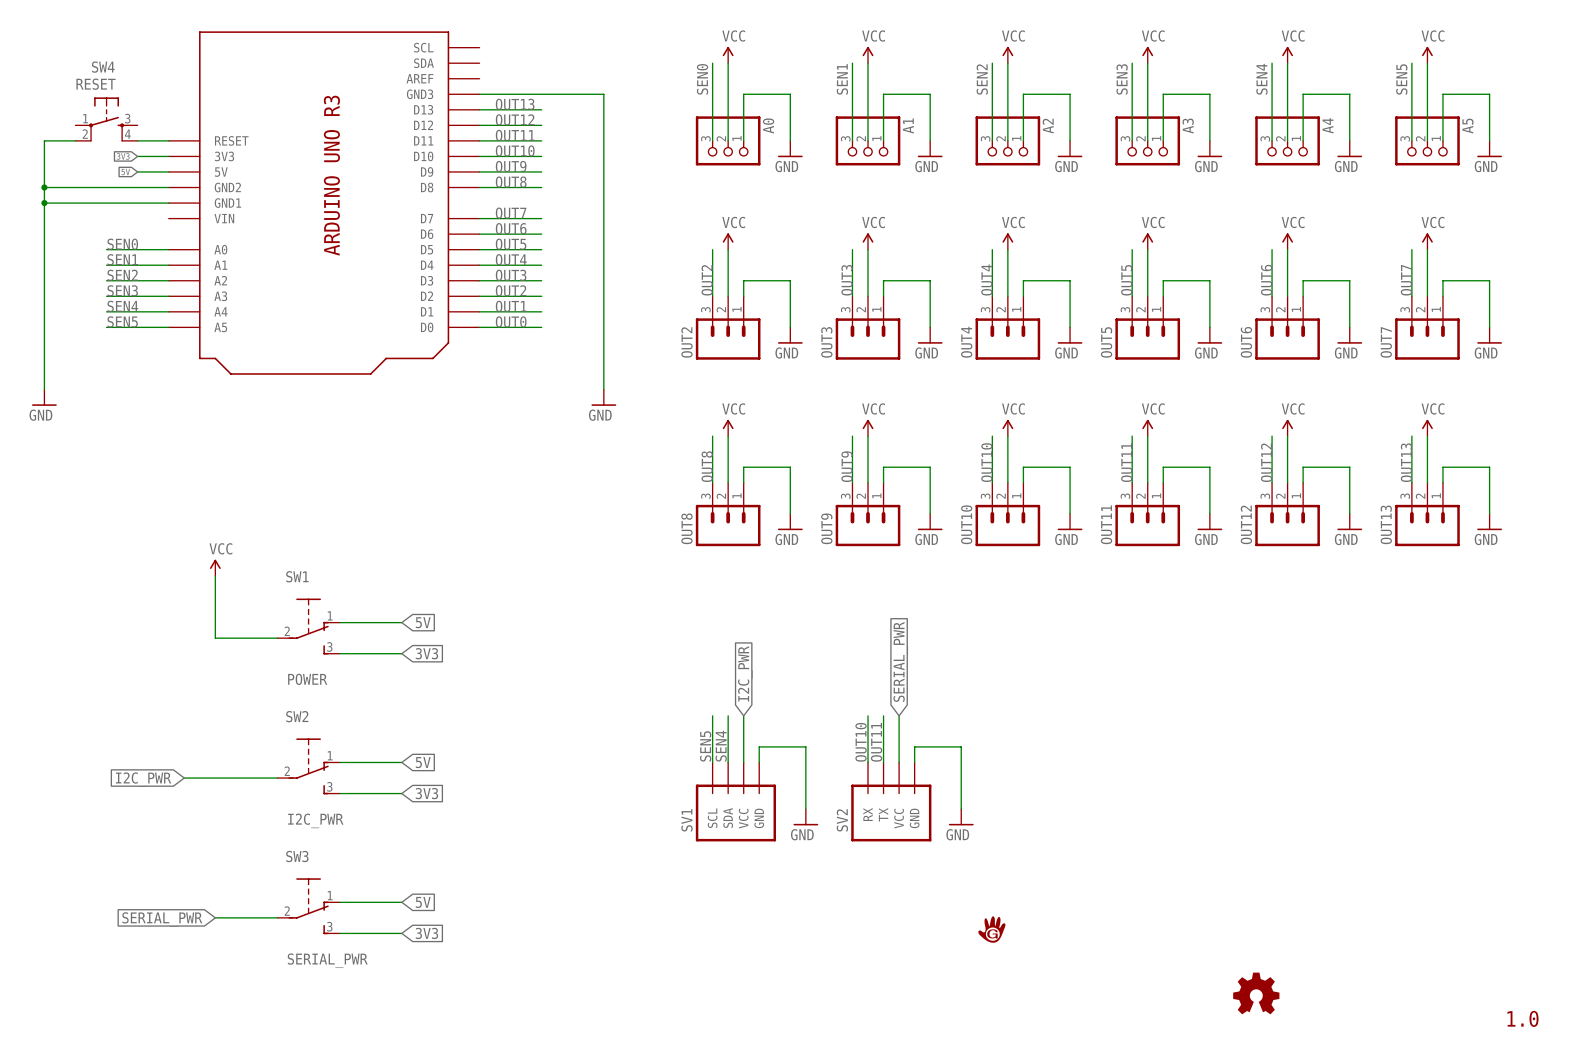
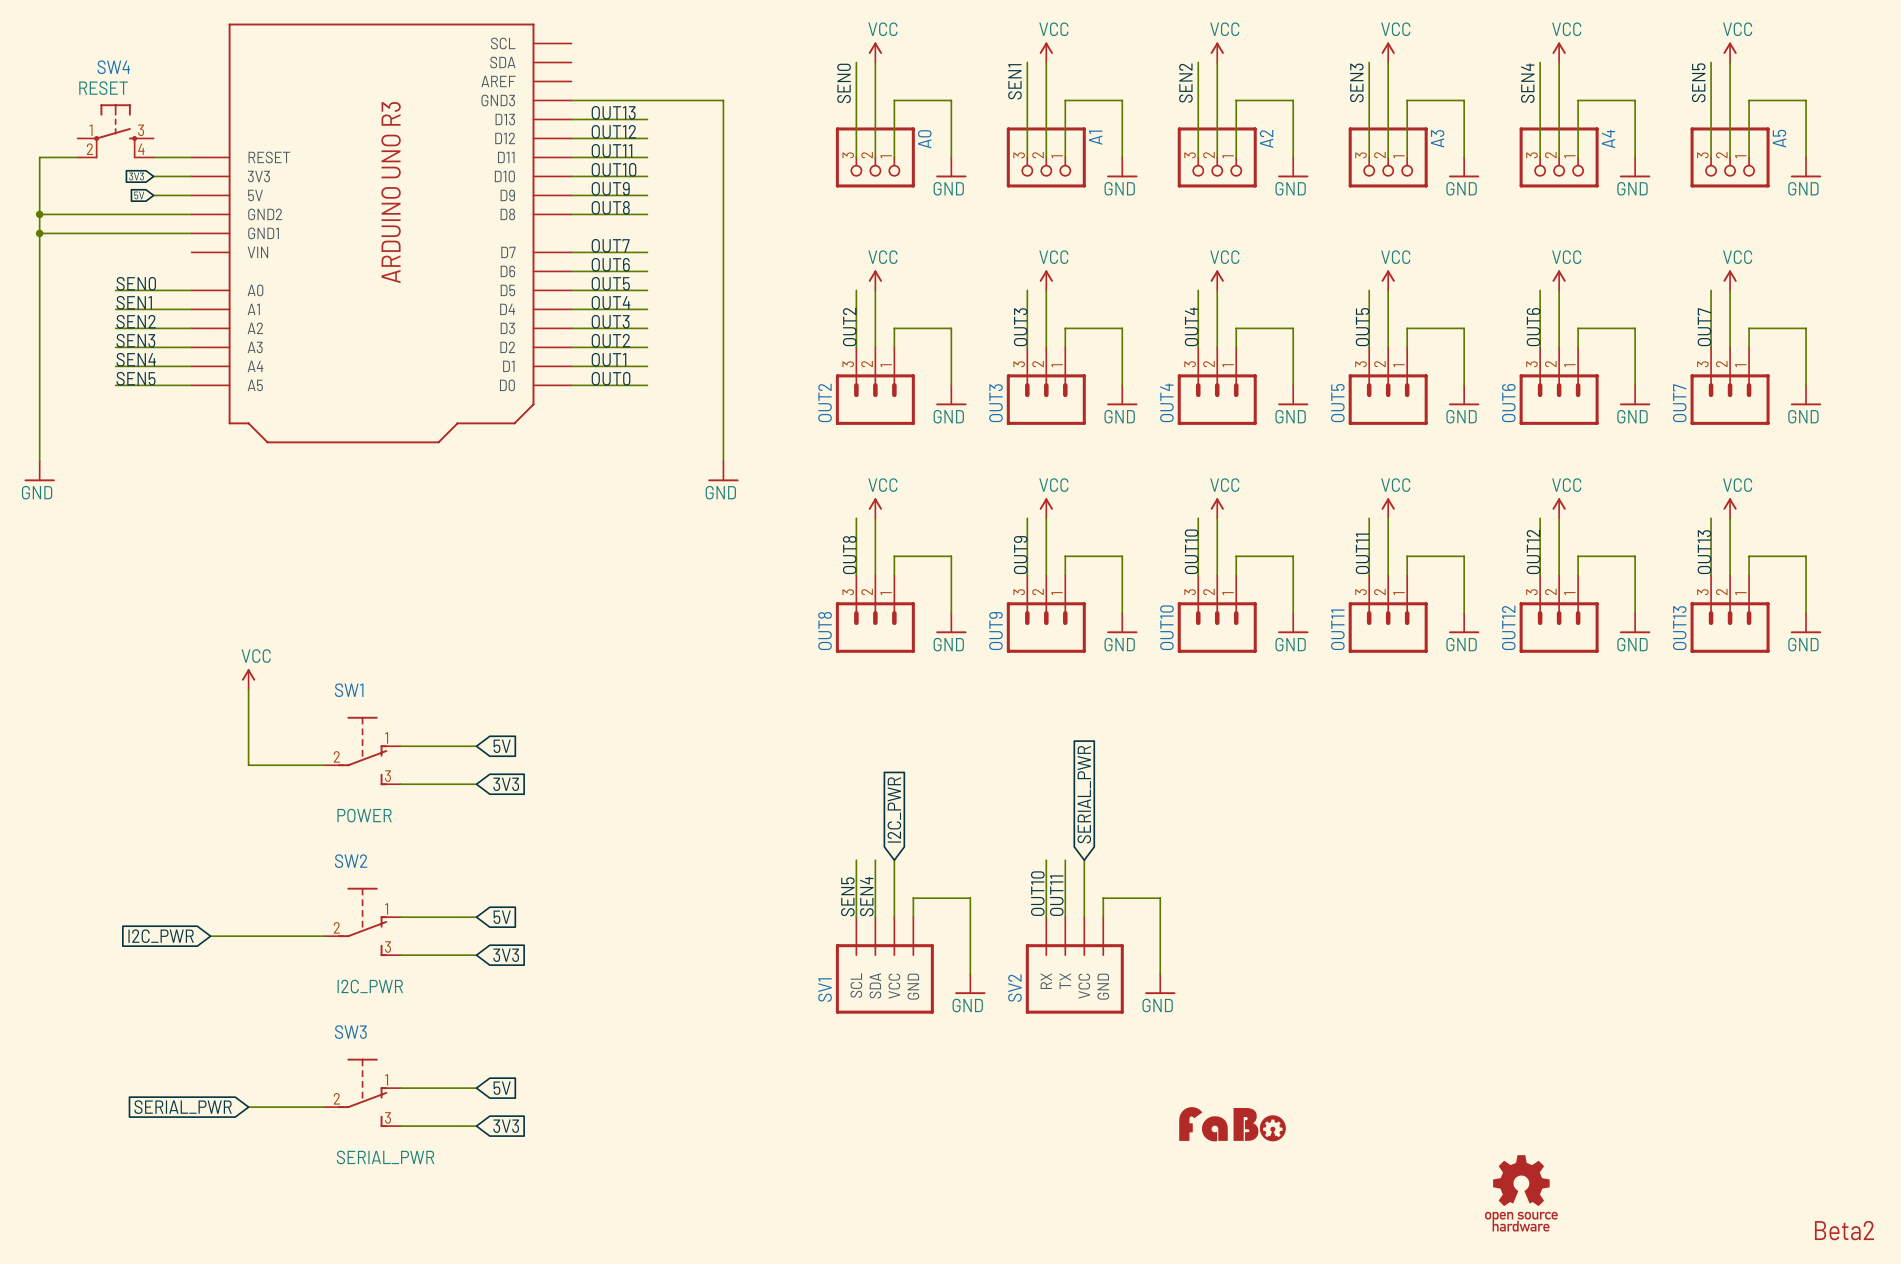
part: (991, 929) -> none
part: none -> (1232, 1124)
part symbol: [1233, 972, 1280, 1015] -> [1485, 1155, 1558, 1232]
text: none -> Beta2 (1844, 1230)
text: 1.0 (1522, 1018) -> none

